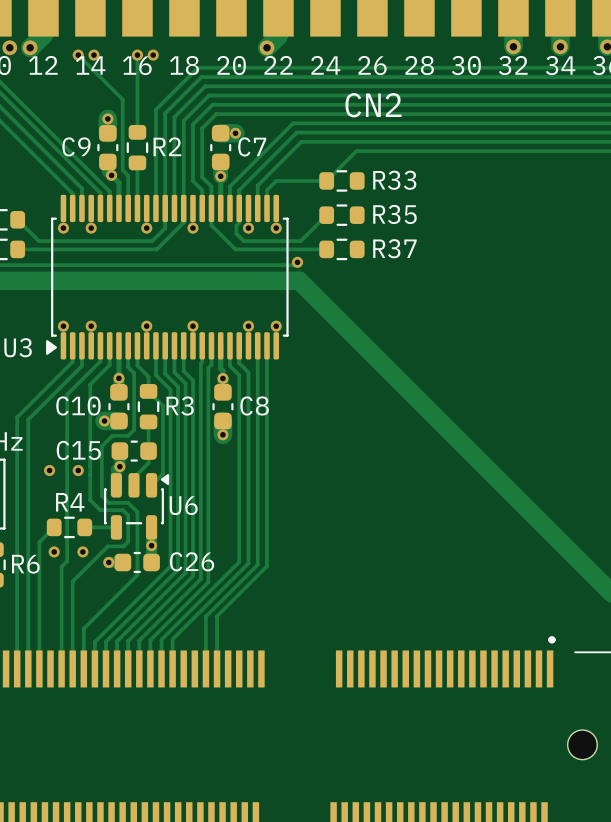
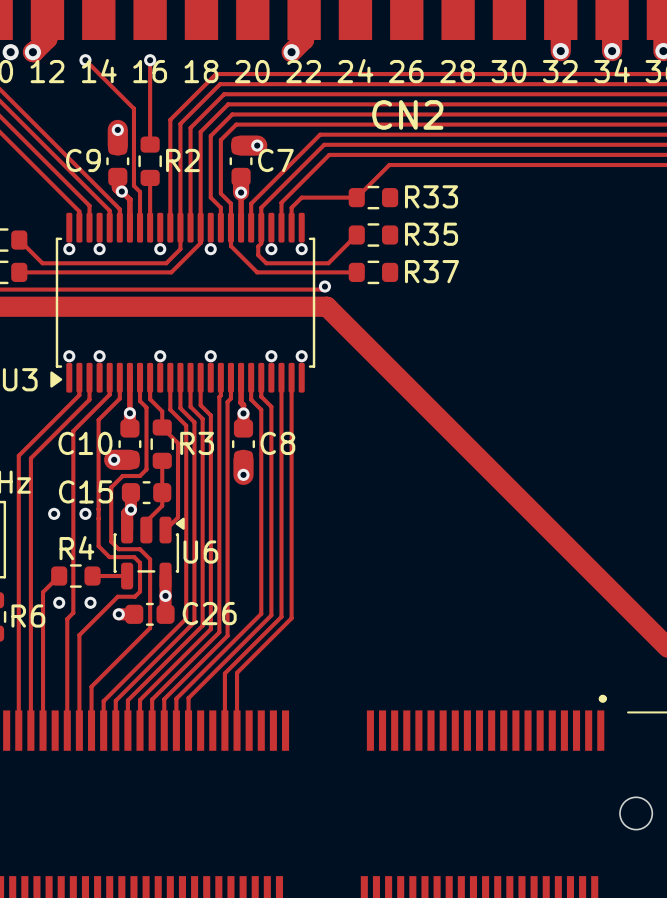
via: (93, 55) -> none
via: (153, 55) -> none

